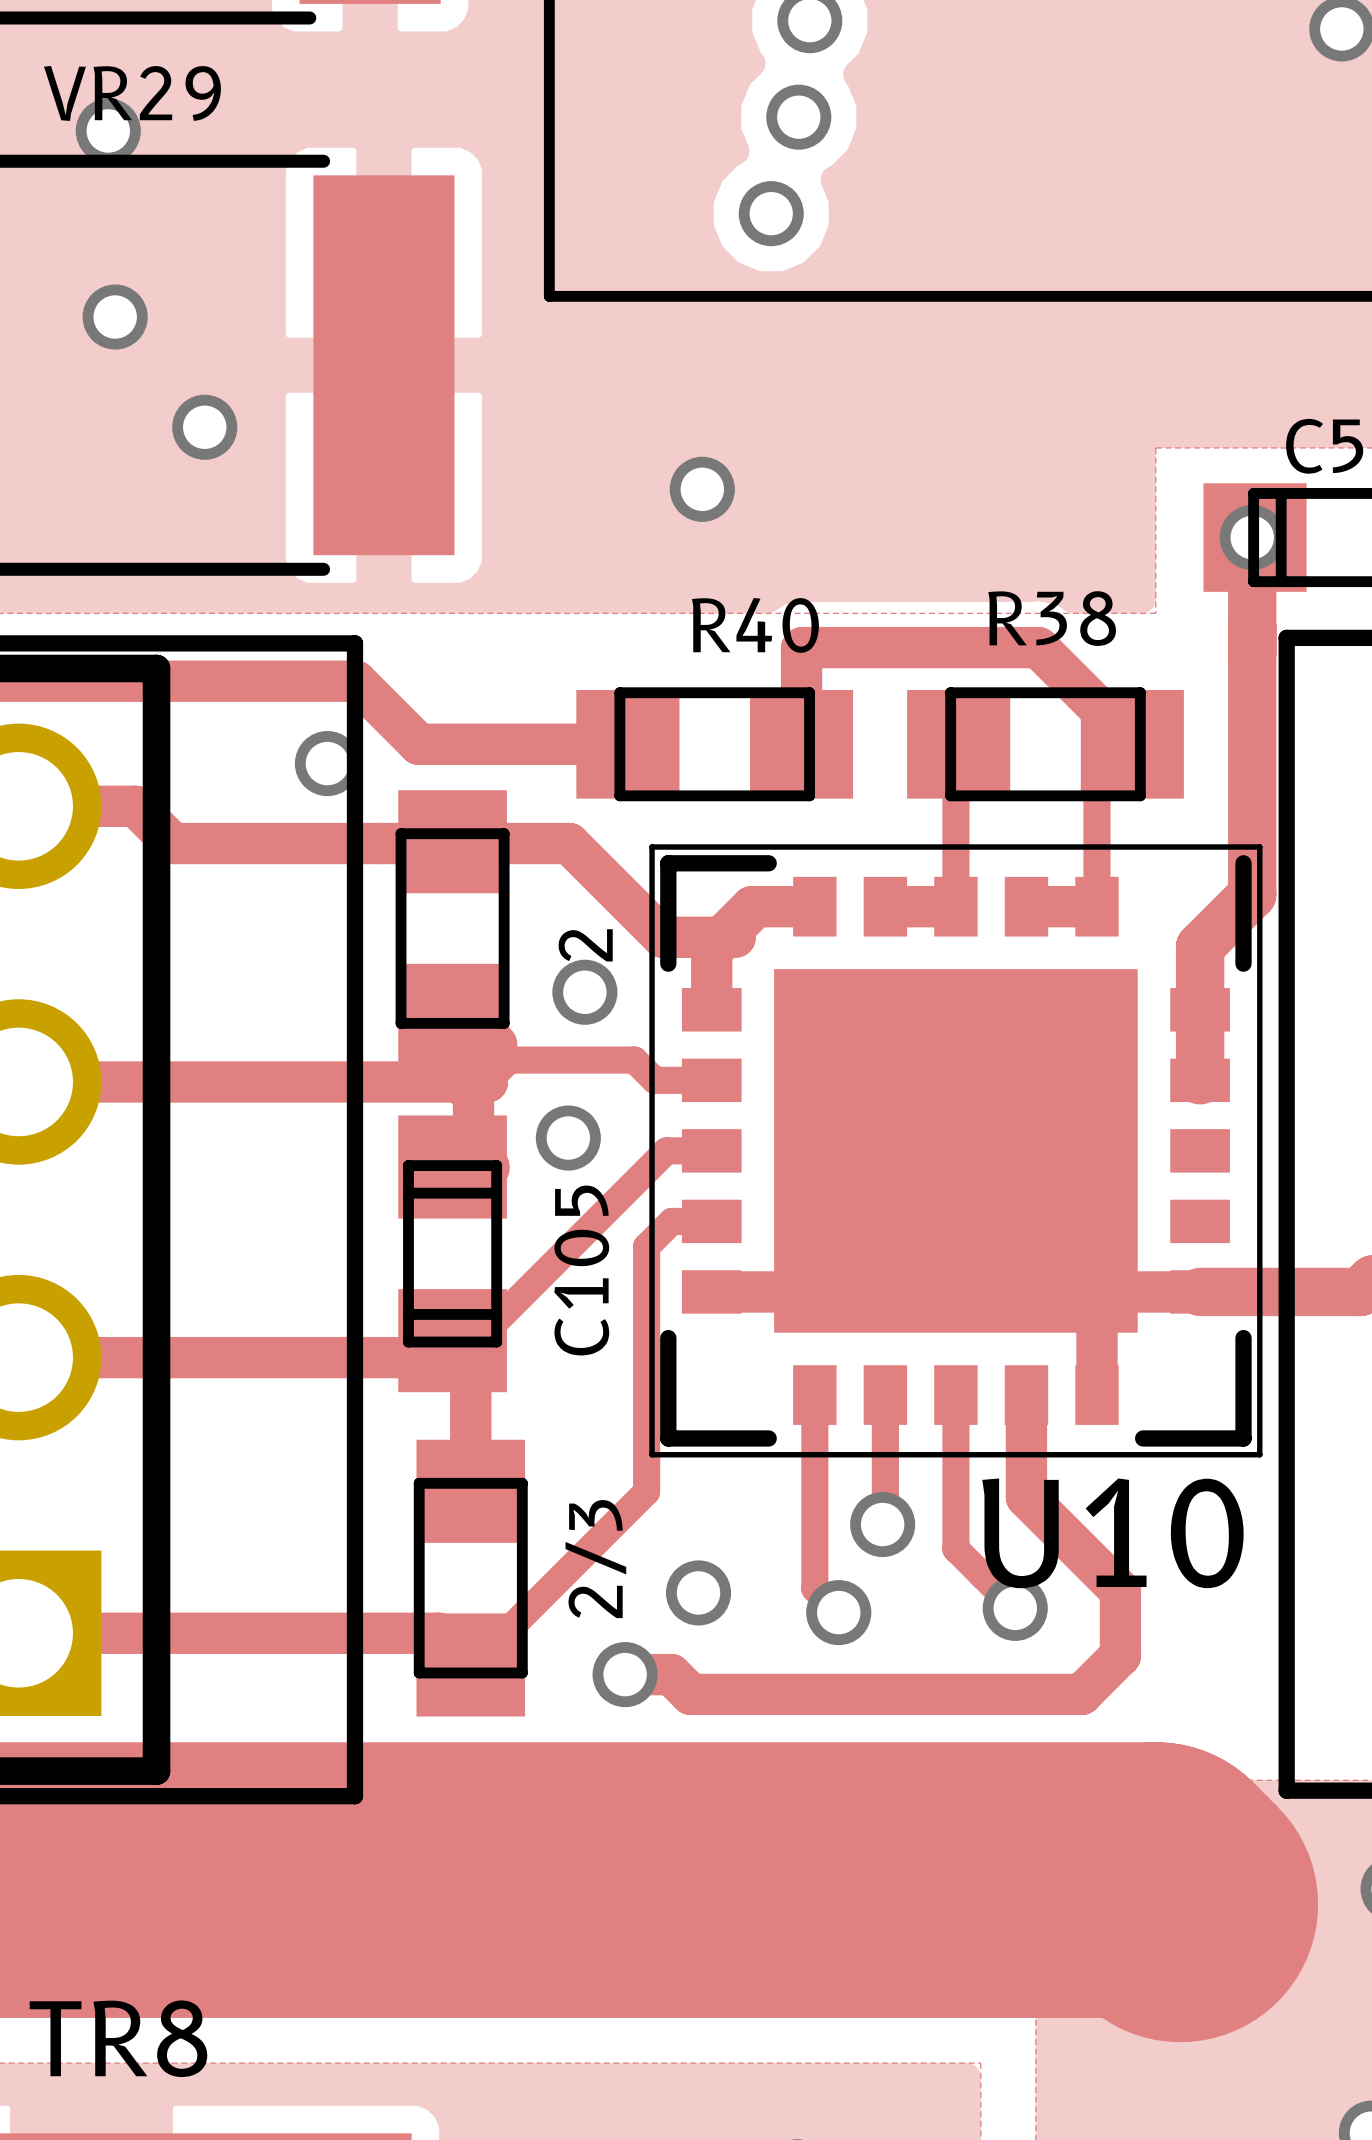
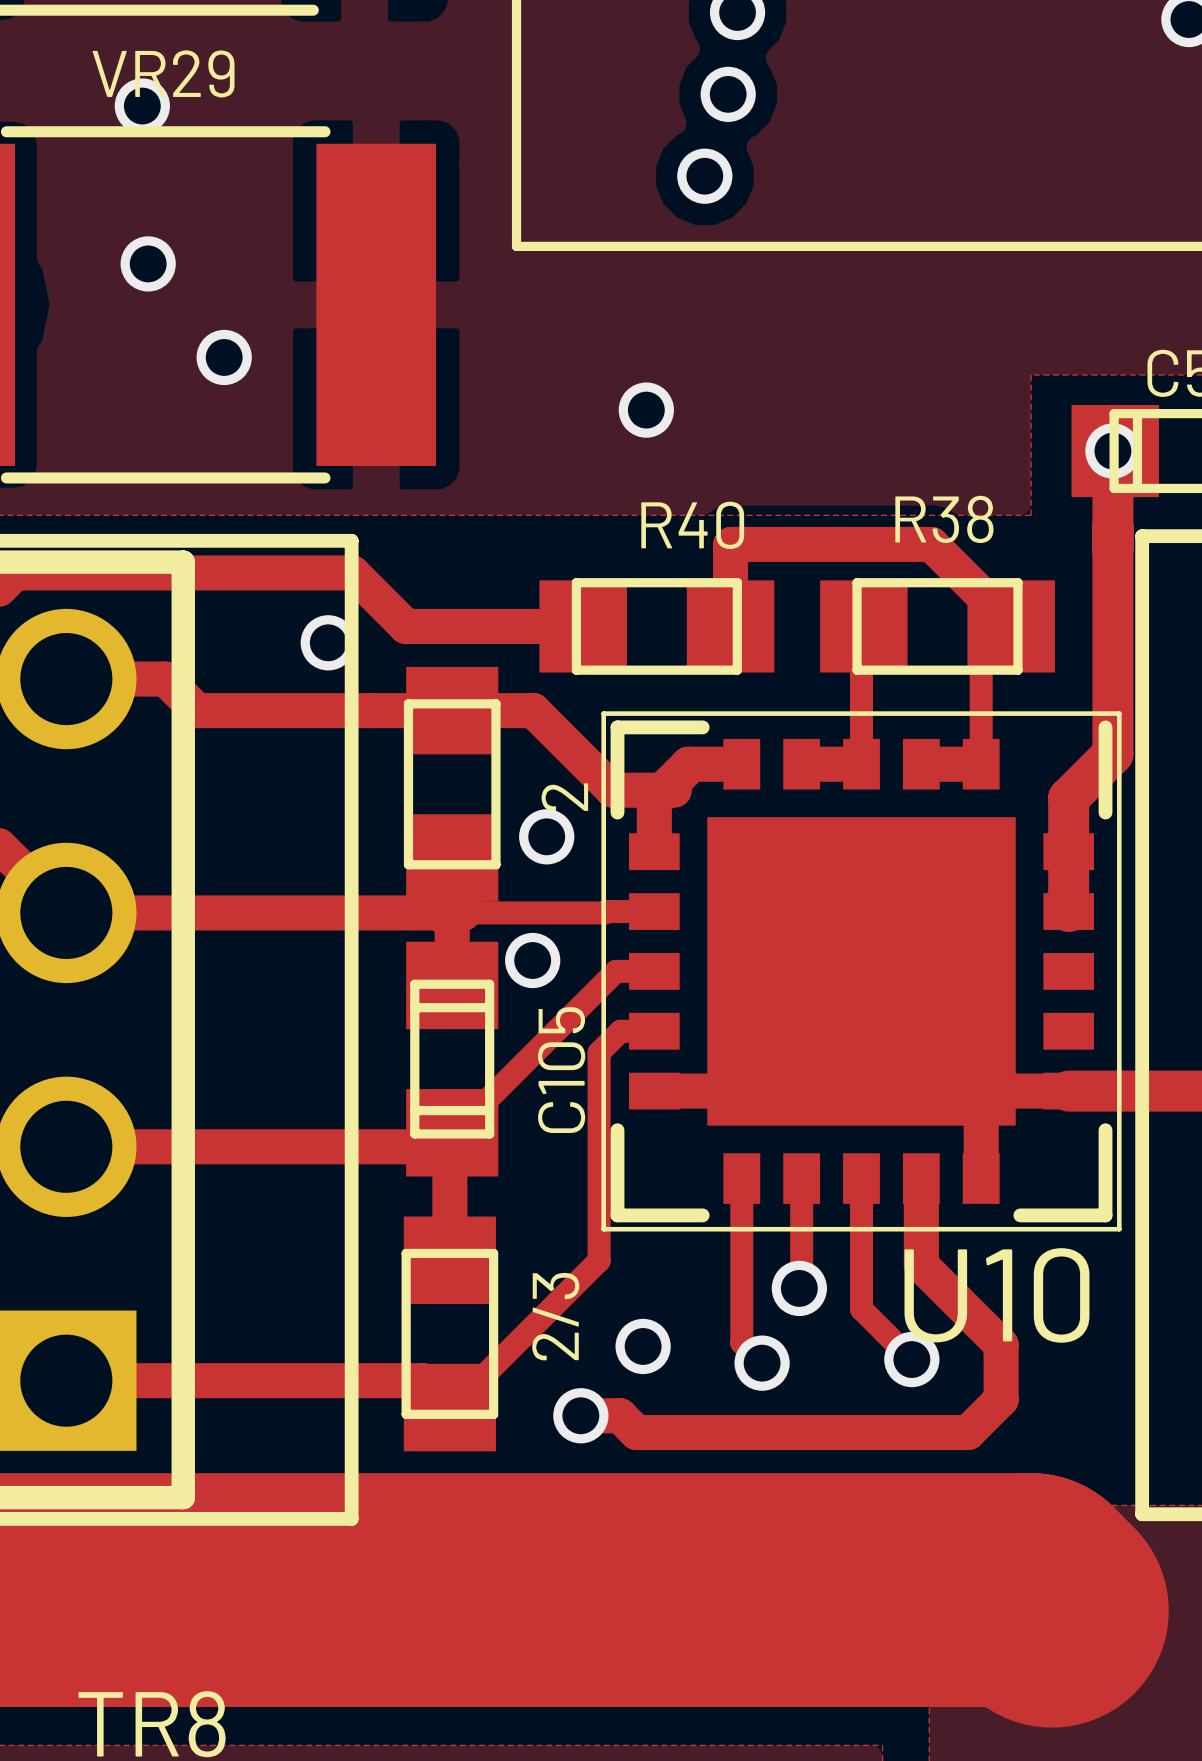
part position: (452, 928) -> (452, 784)
track: (654, 1080) (634, 1060) (509, 1060) (487, 1081) -> (605, 911) (463, 912)
C105 position: (452, 1253) -> (452, 1059)

